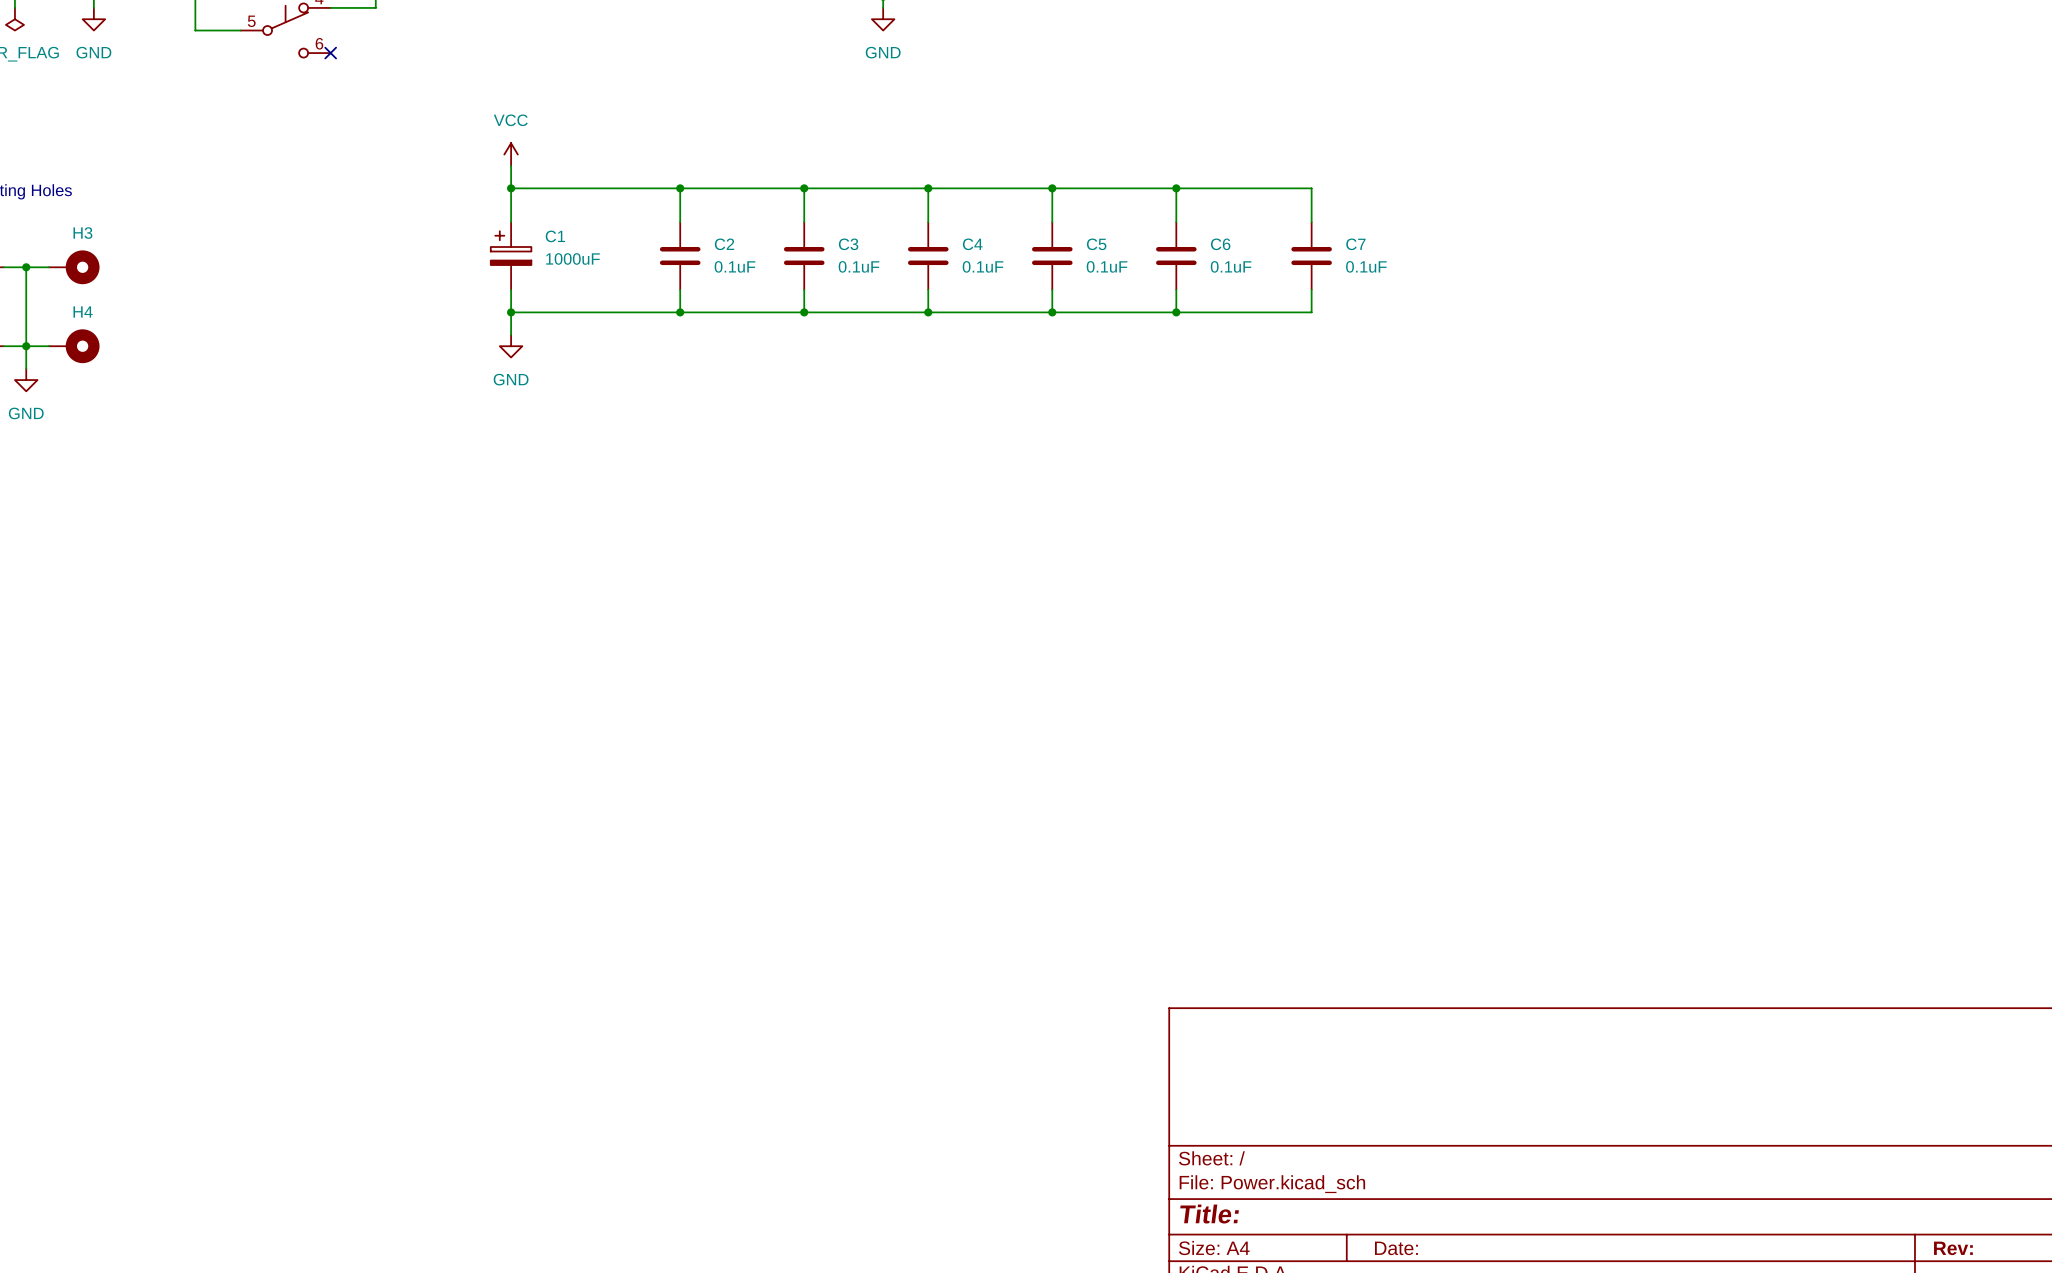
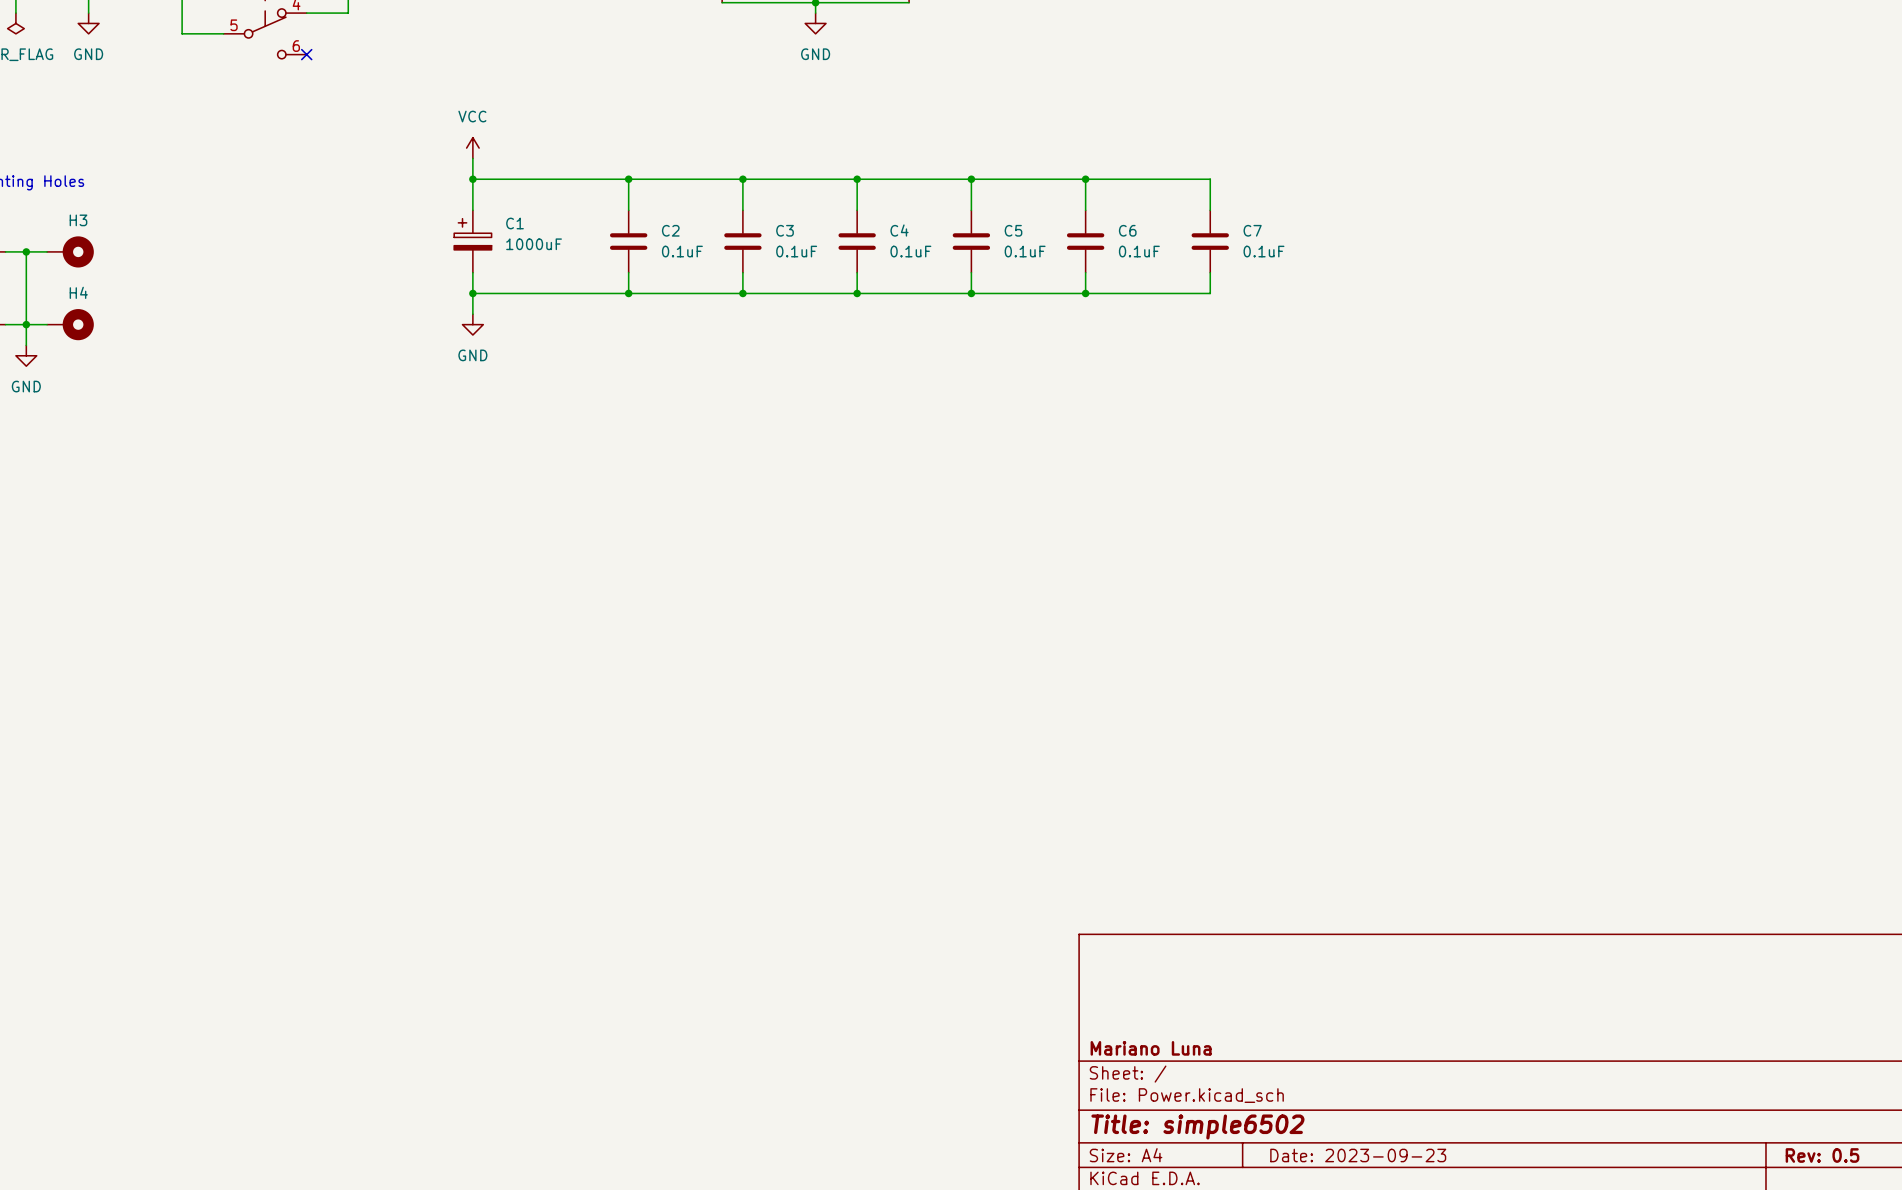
title block: none -> Mariano Luna (1151, 1048)
title block: Title: (1209, 1214) -> Title: simple6502 (1197, 1126)
title block: Date: (1396, 1248) -> Date: 2023-09-23 (1358, 1155)
title block: Rev: (1953, 1248) -> Rev: 0.5 (1822, 1155)

